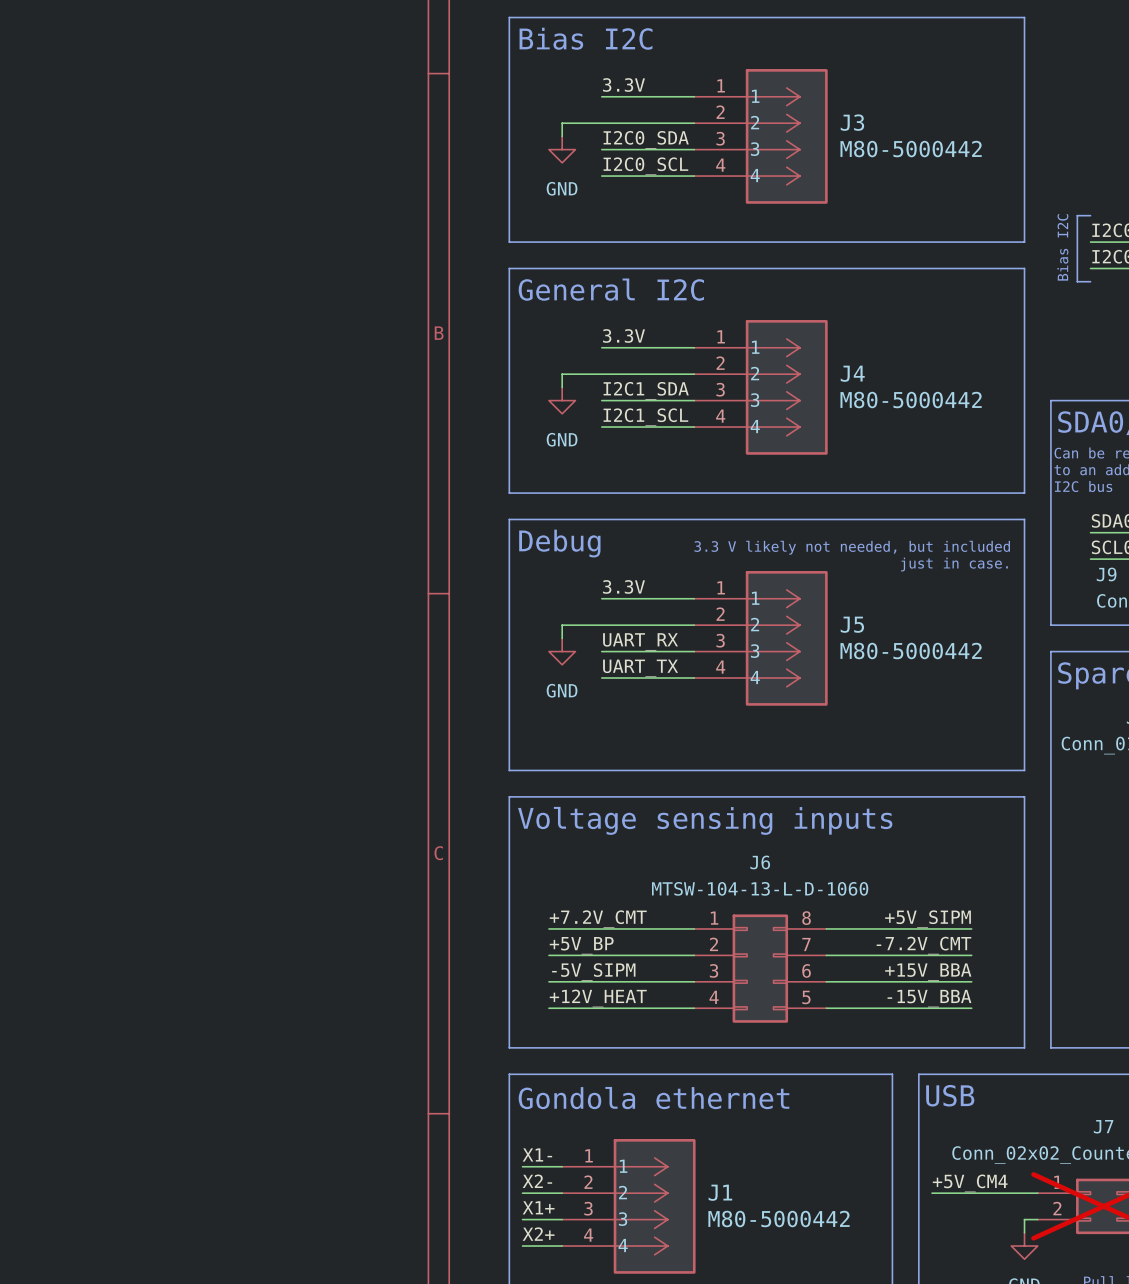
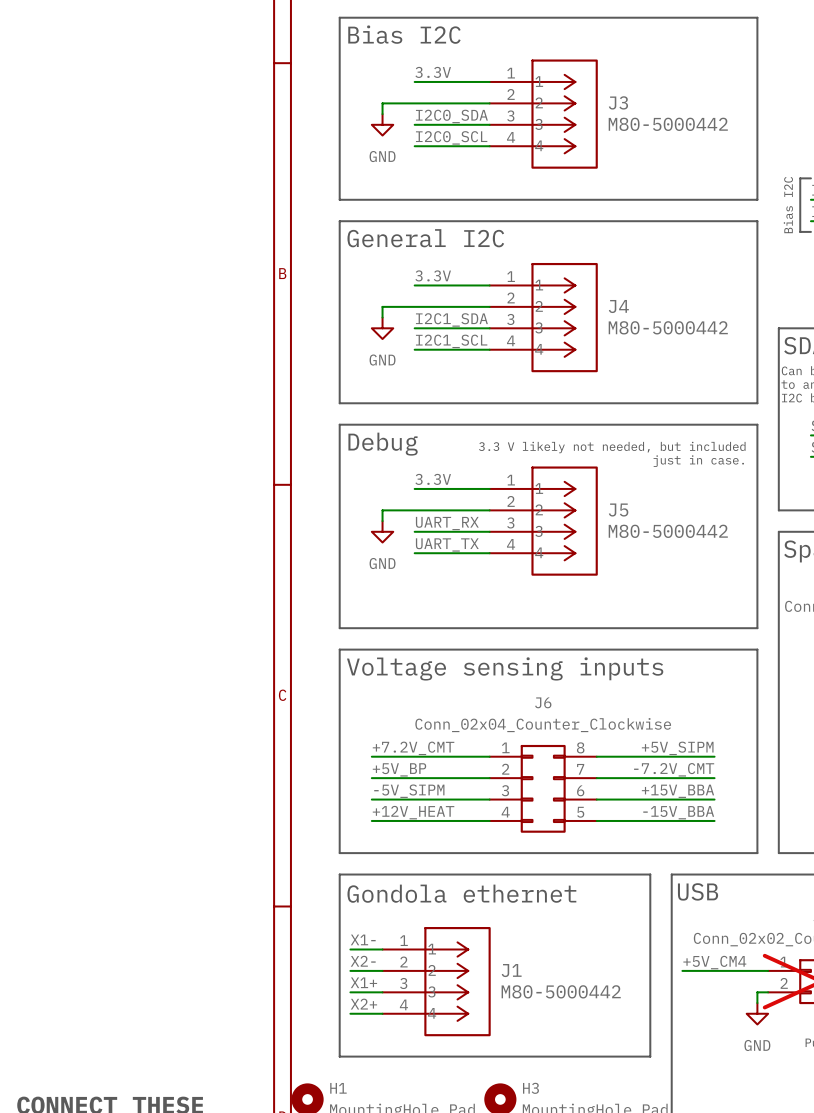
J6 value: MTSW-104-13-L-D-1060 (760, 888) -> Conn_02x04_Counter_Clockwise (543, 725)

